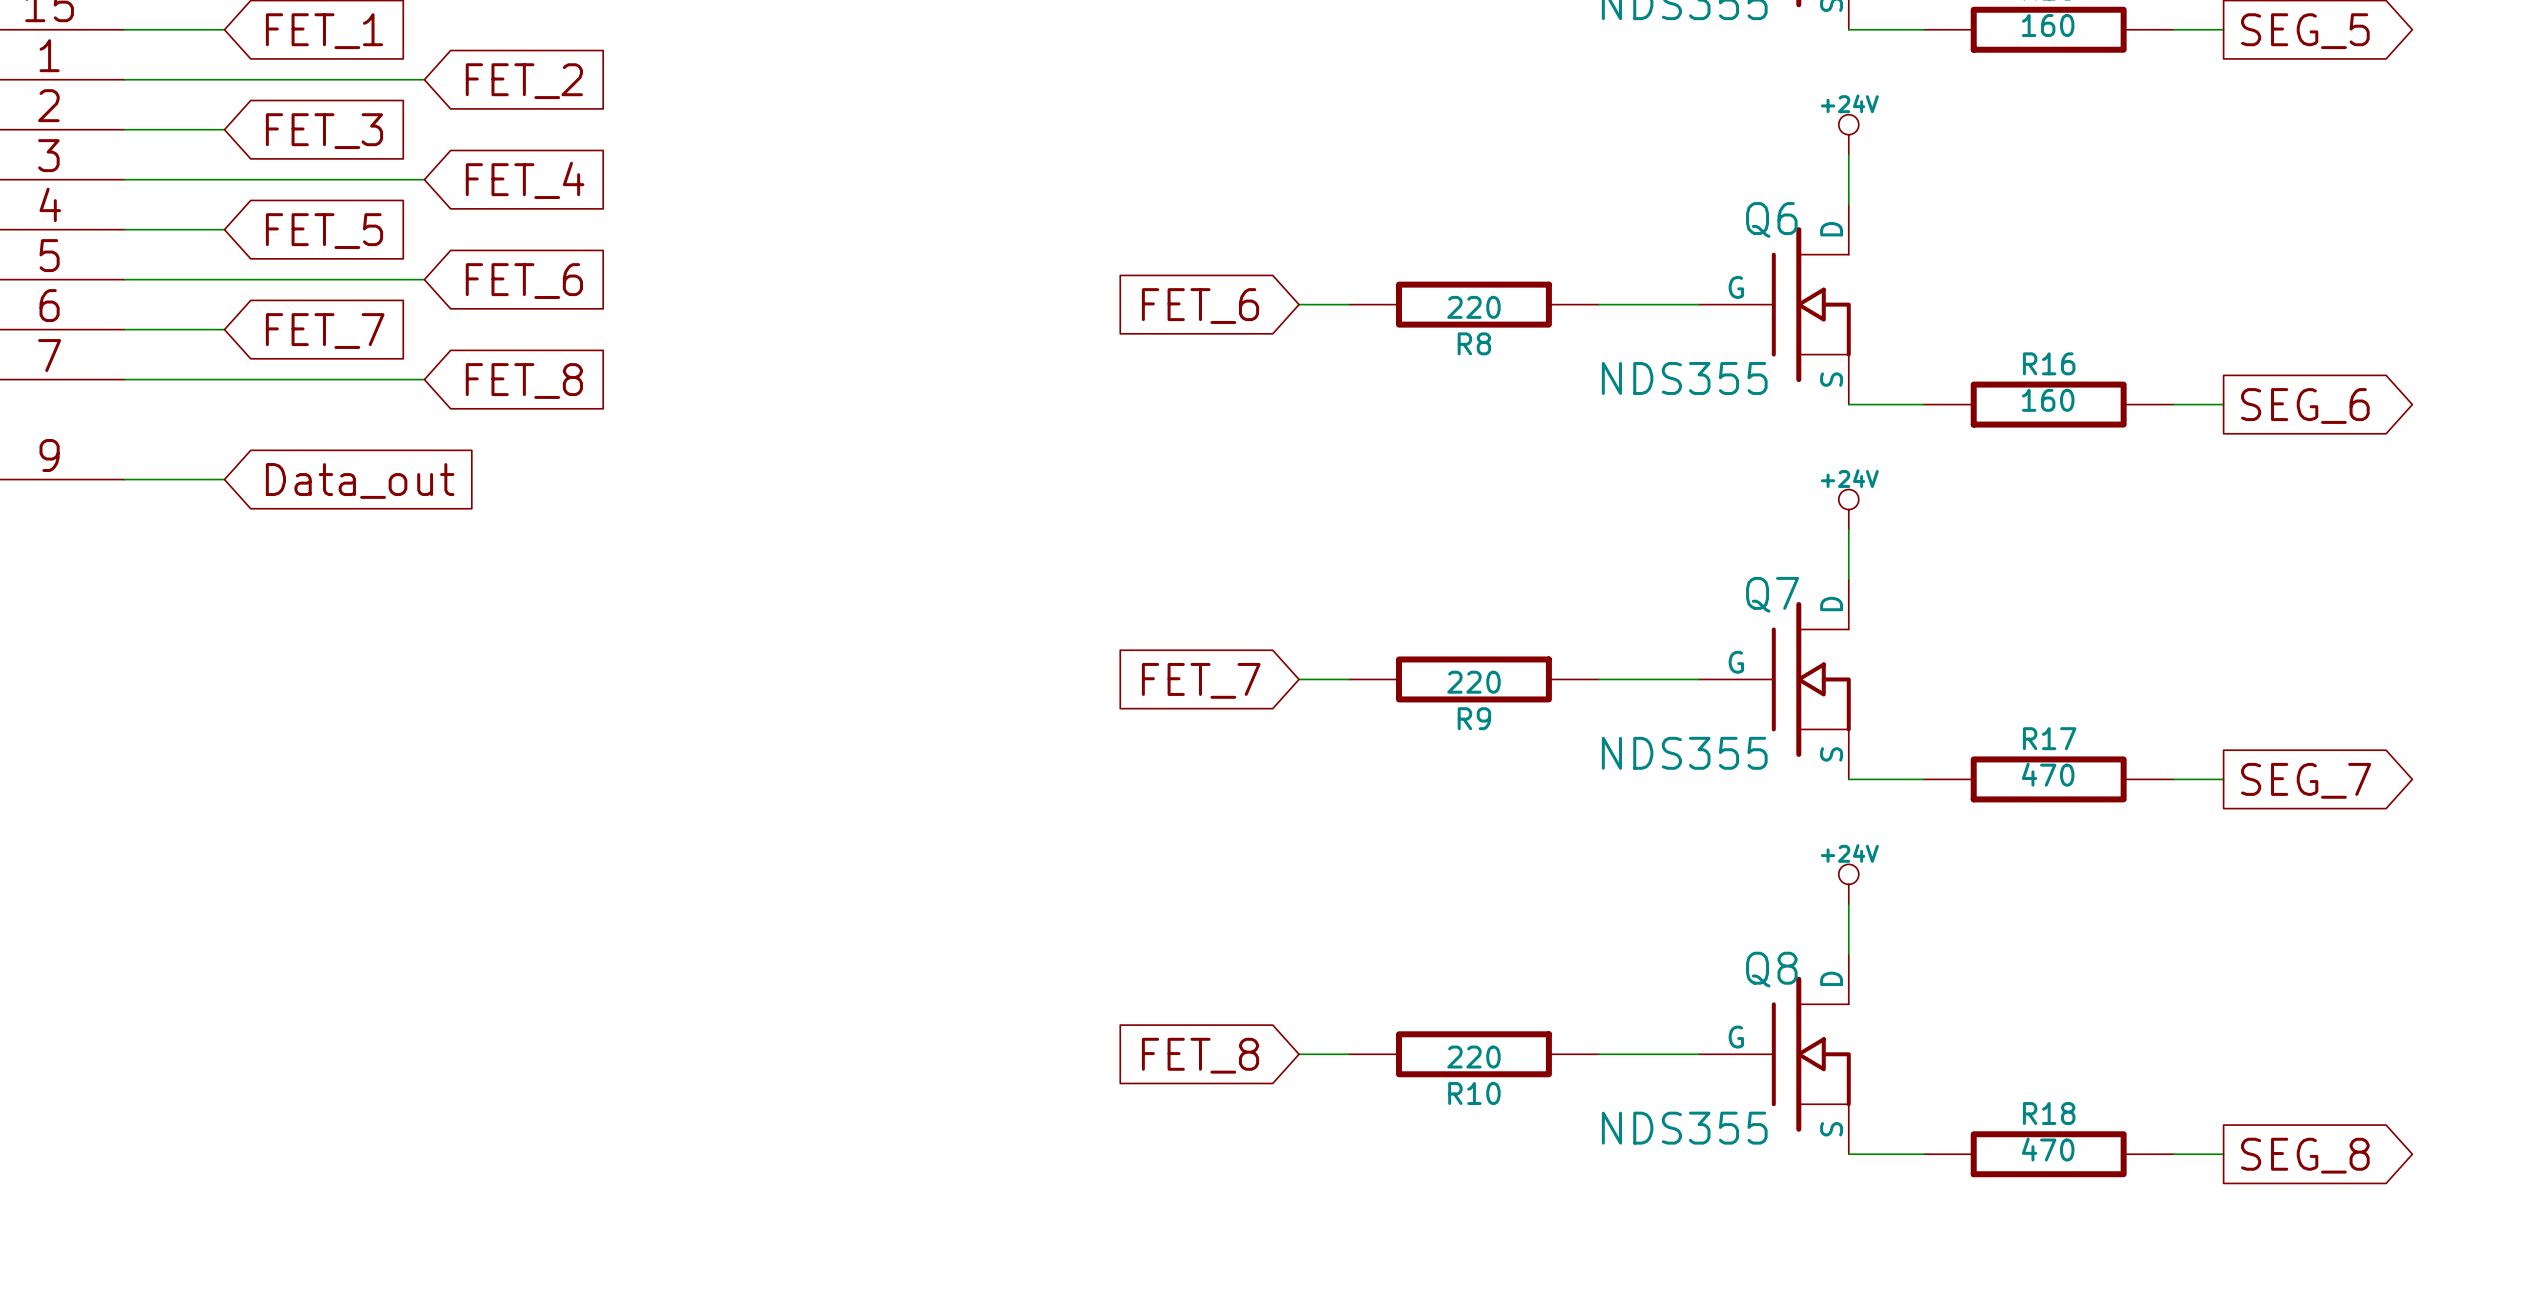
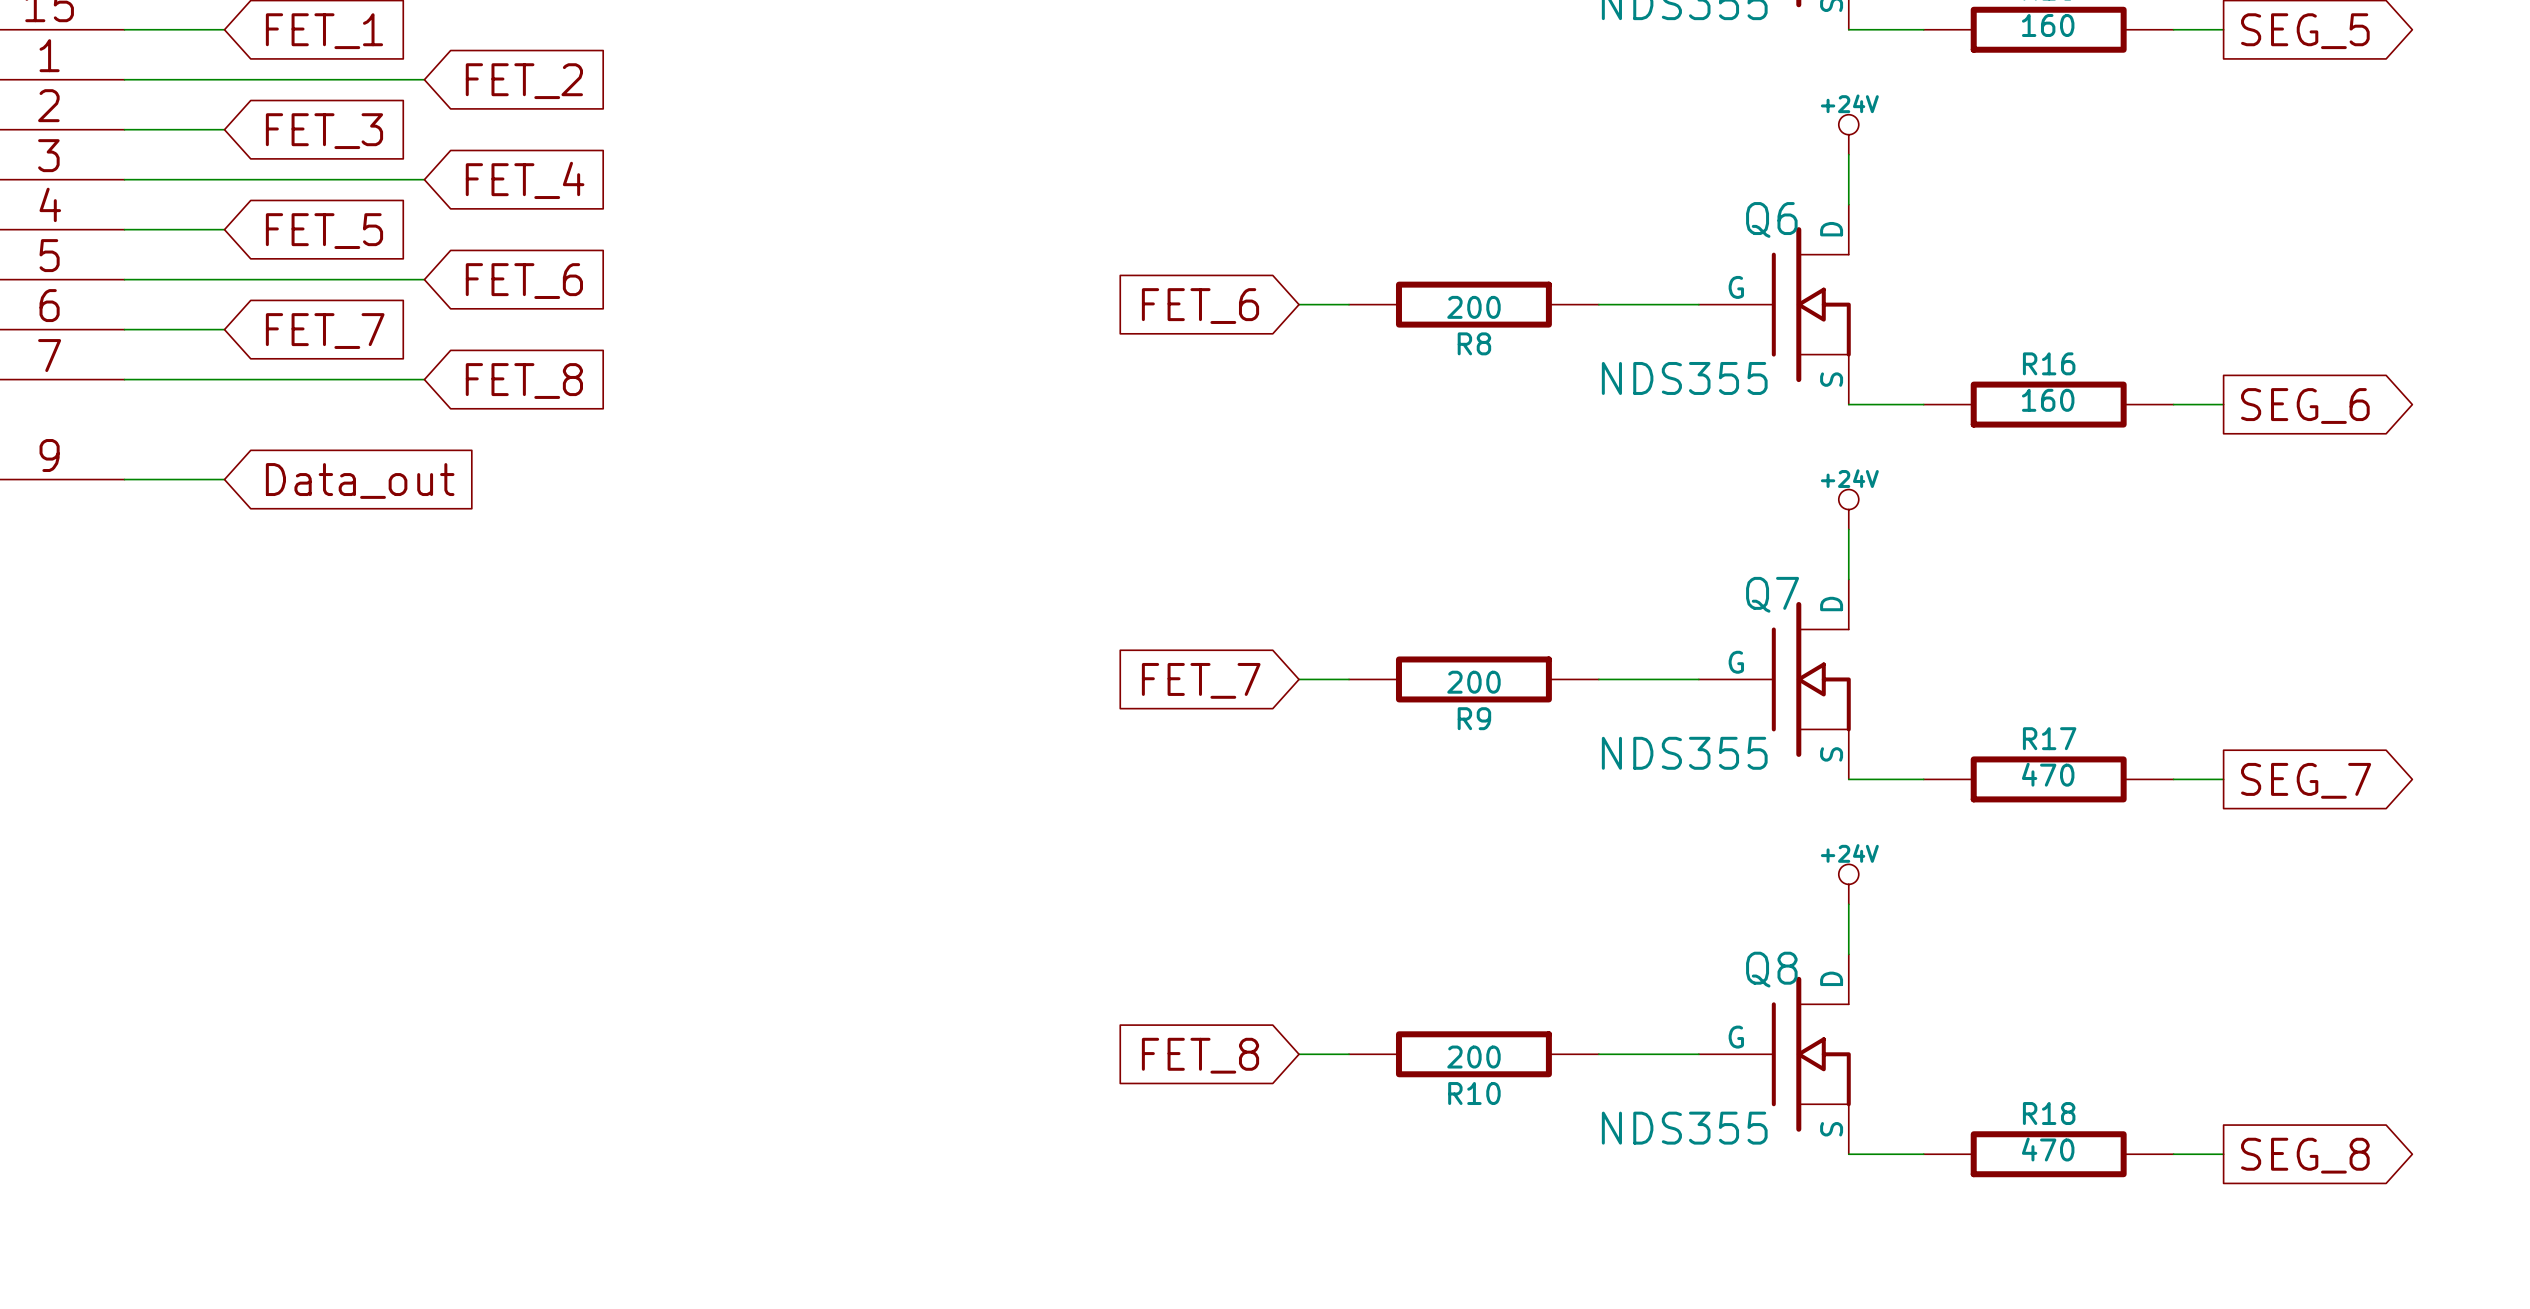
R8 value: 220 (1473, 307) -> 200 (1473, 307)
R9 value: 220 (1473, 682) -> 200 (1473, 682)
R10 value: 220 (1473, 1057) -> 200 (1473, 1057)

